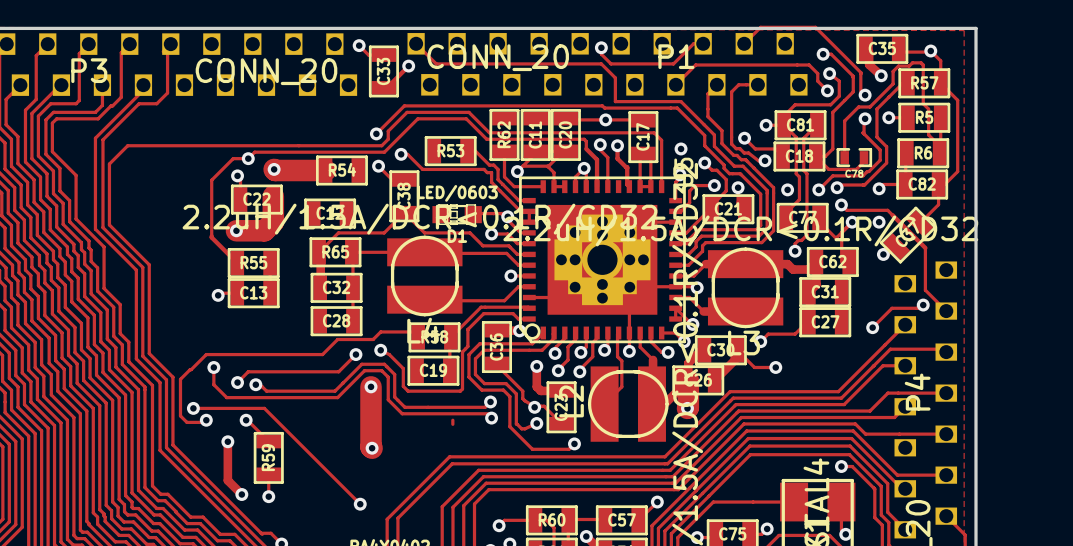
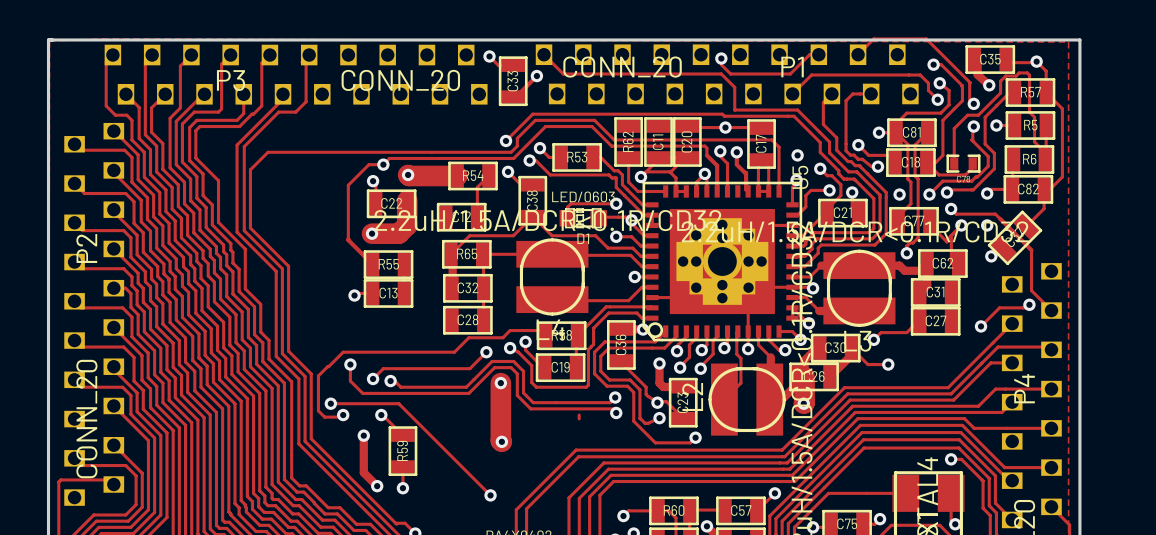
track: none -> (540, 148) (549, 157) (561, 157)
via: none -> (540, 148)
track: none -> (488, 175) (477, 187) (477, 217)
track: none -> (616, 203) (570, 203) (567, 206) (567, 218)
via: none -> (616, 203)
track: none -> (525, 341) (525, 350) (544, 367)
via: none -> (525, 341)

